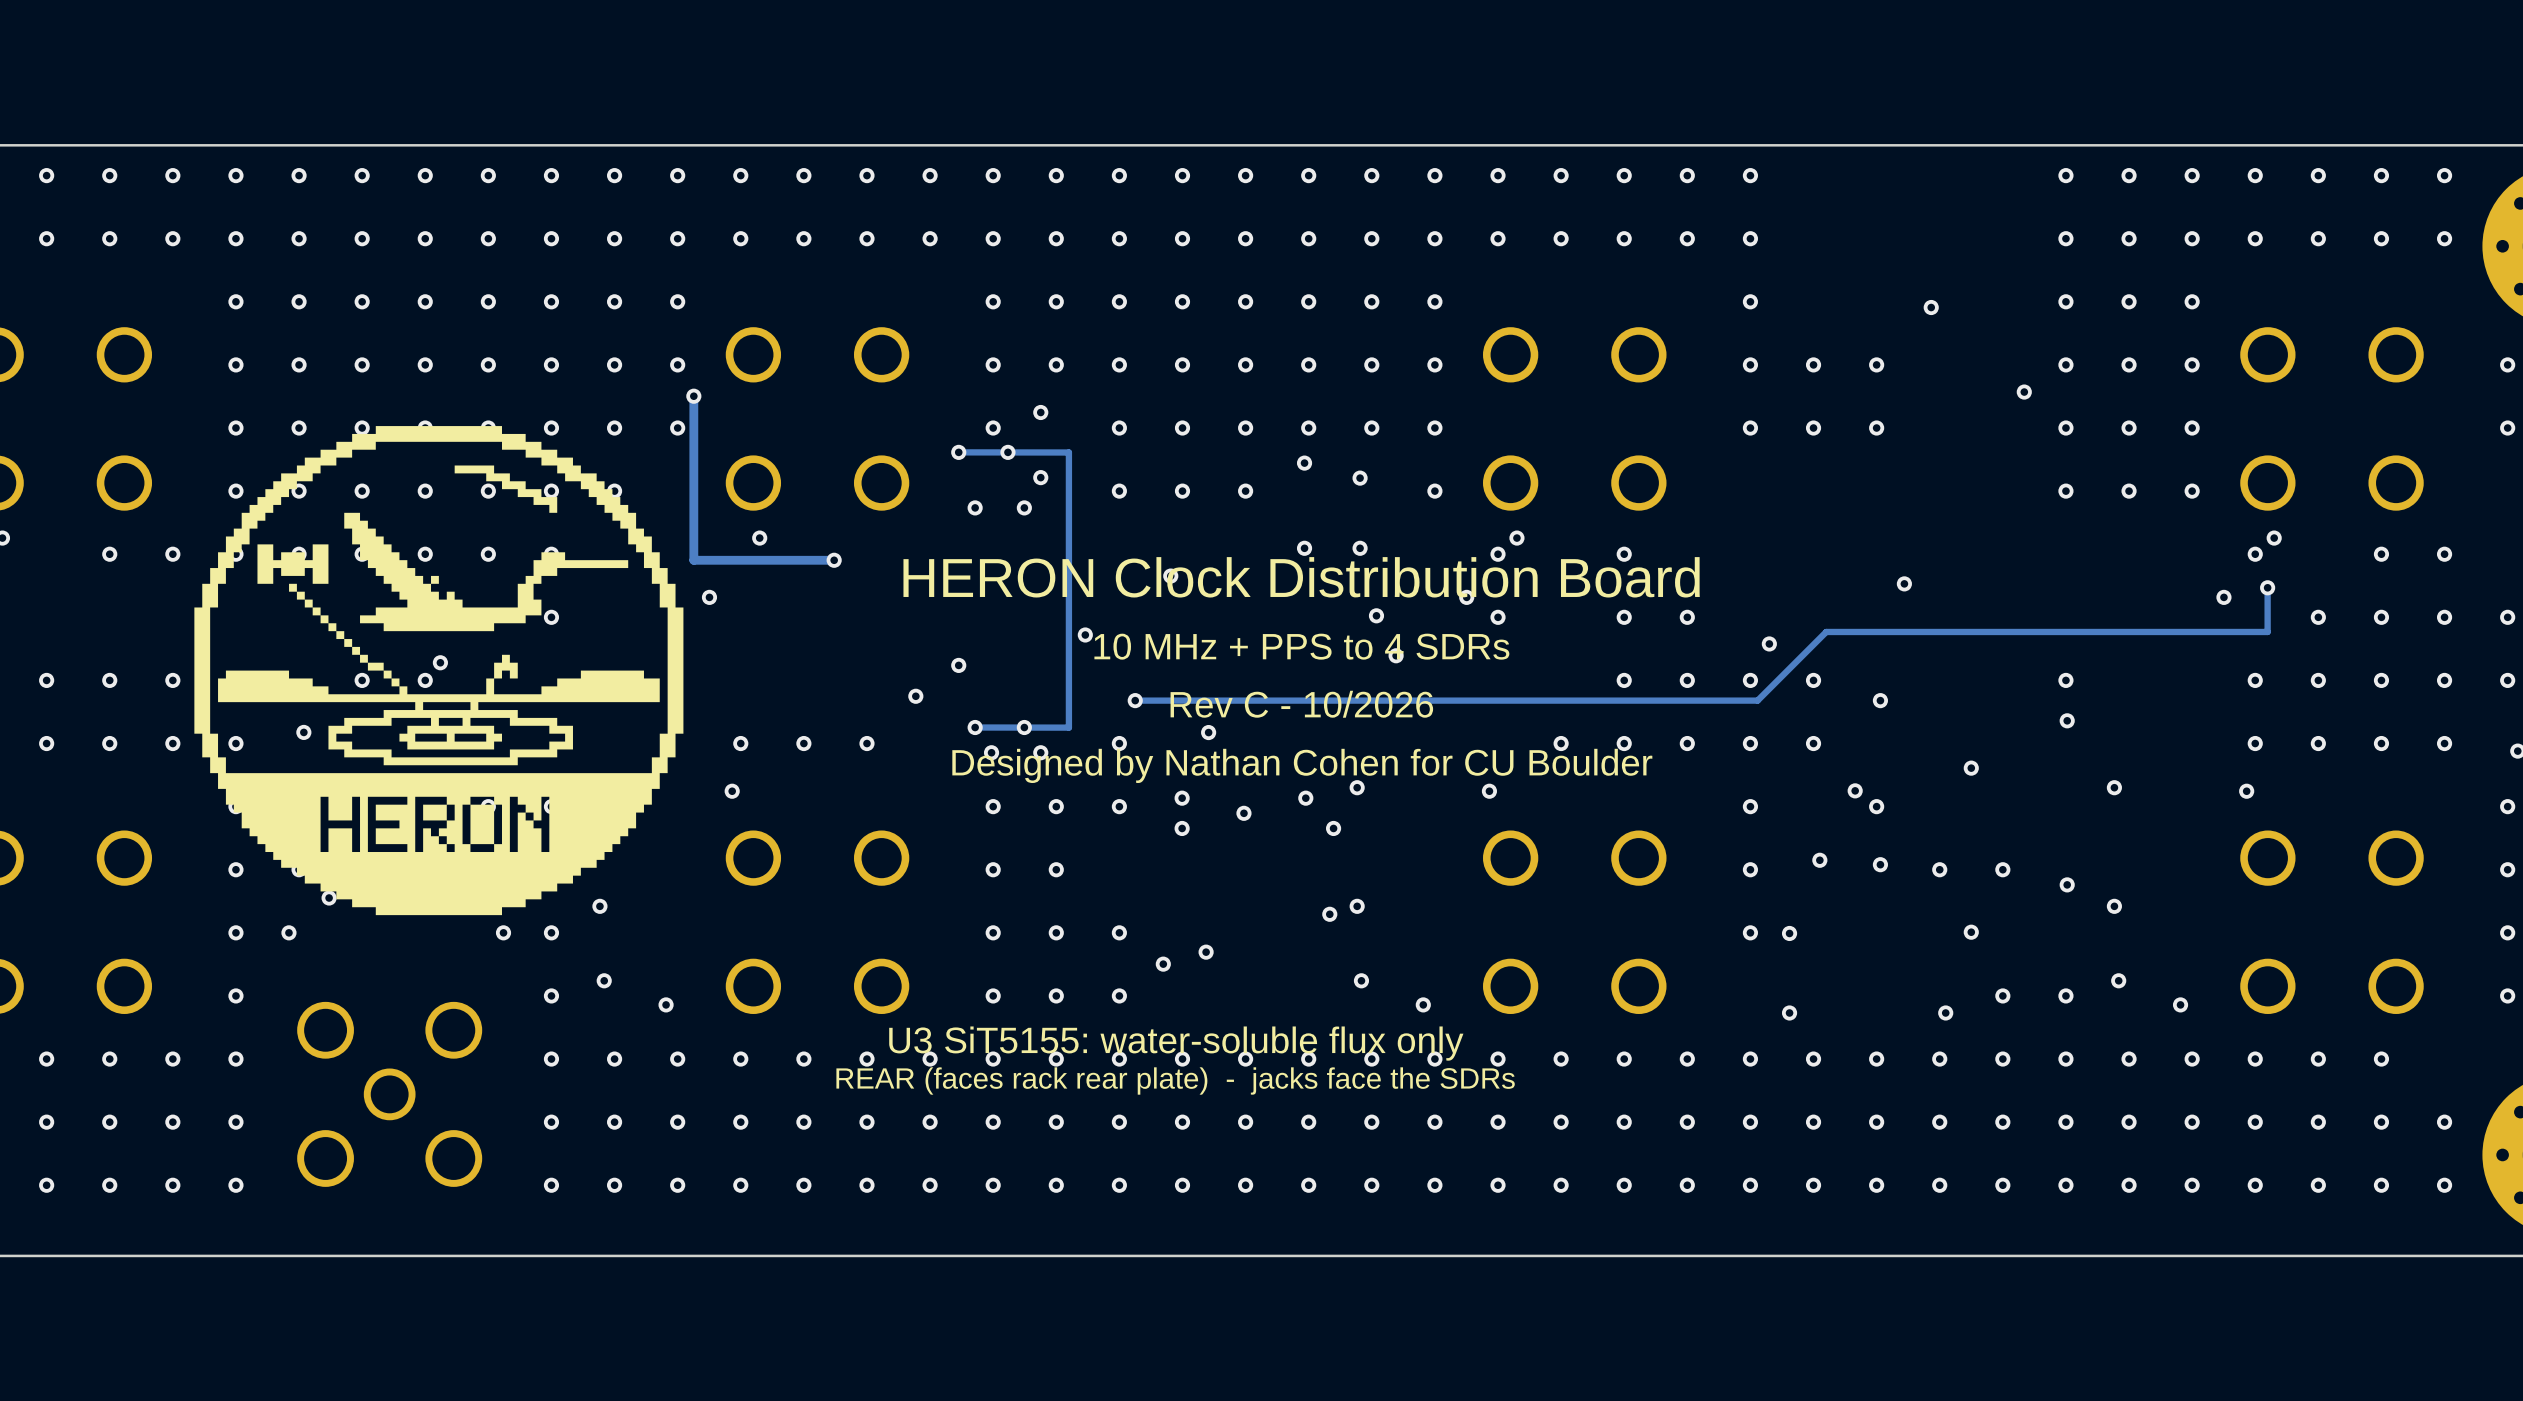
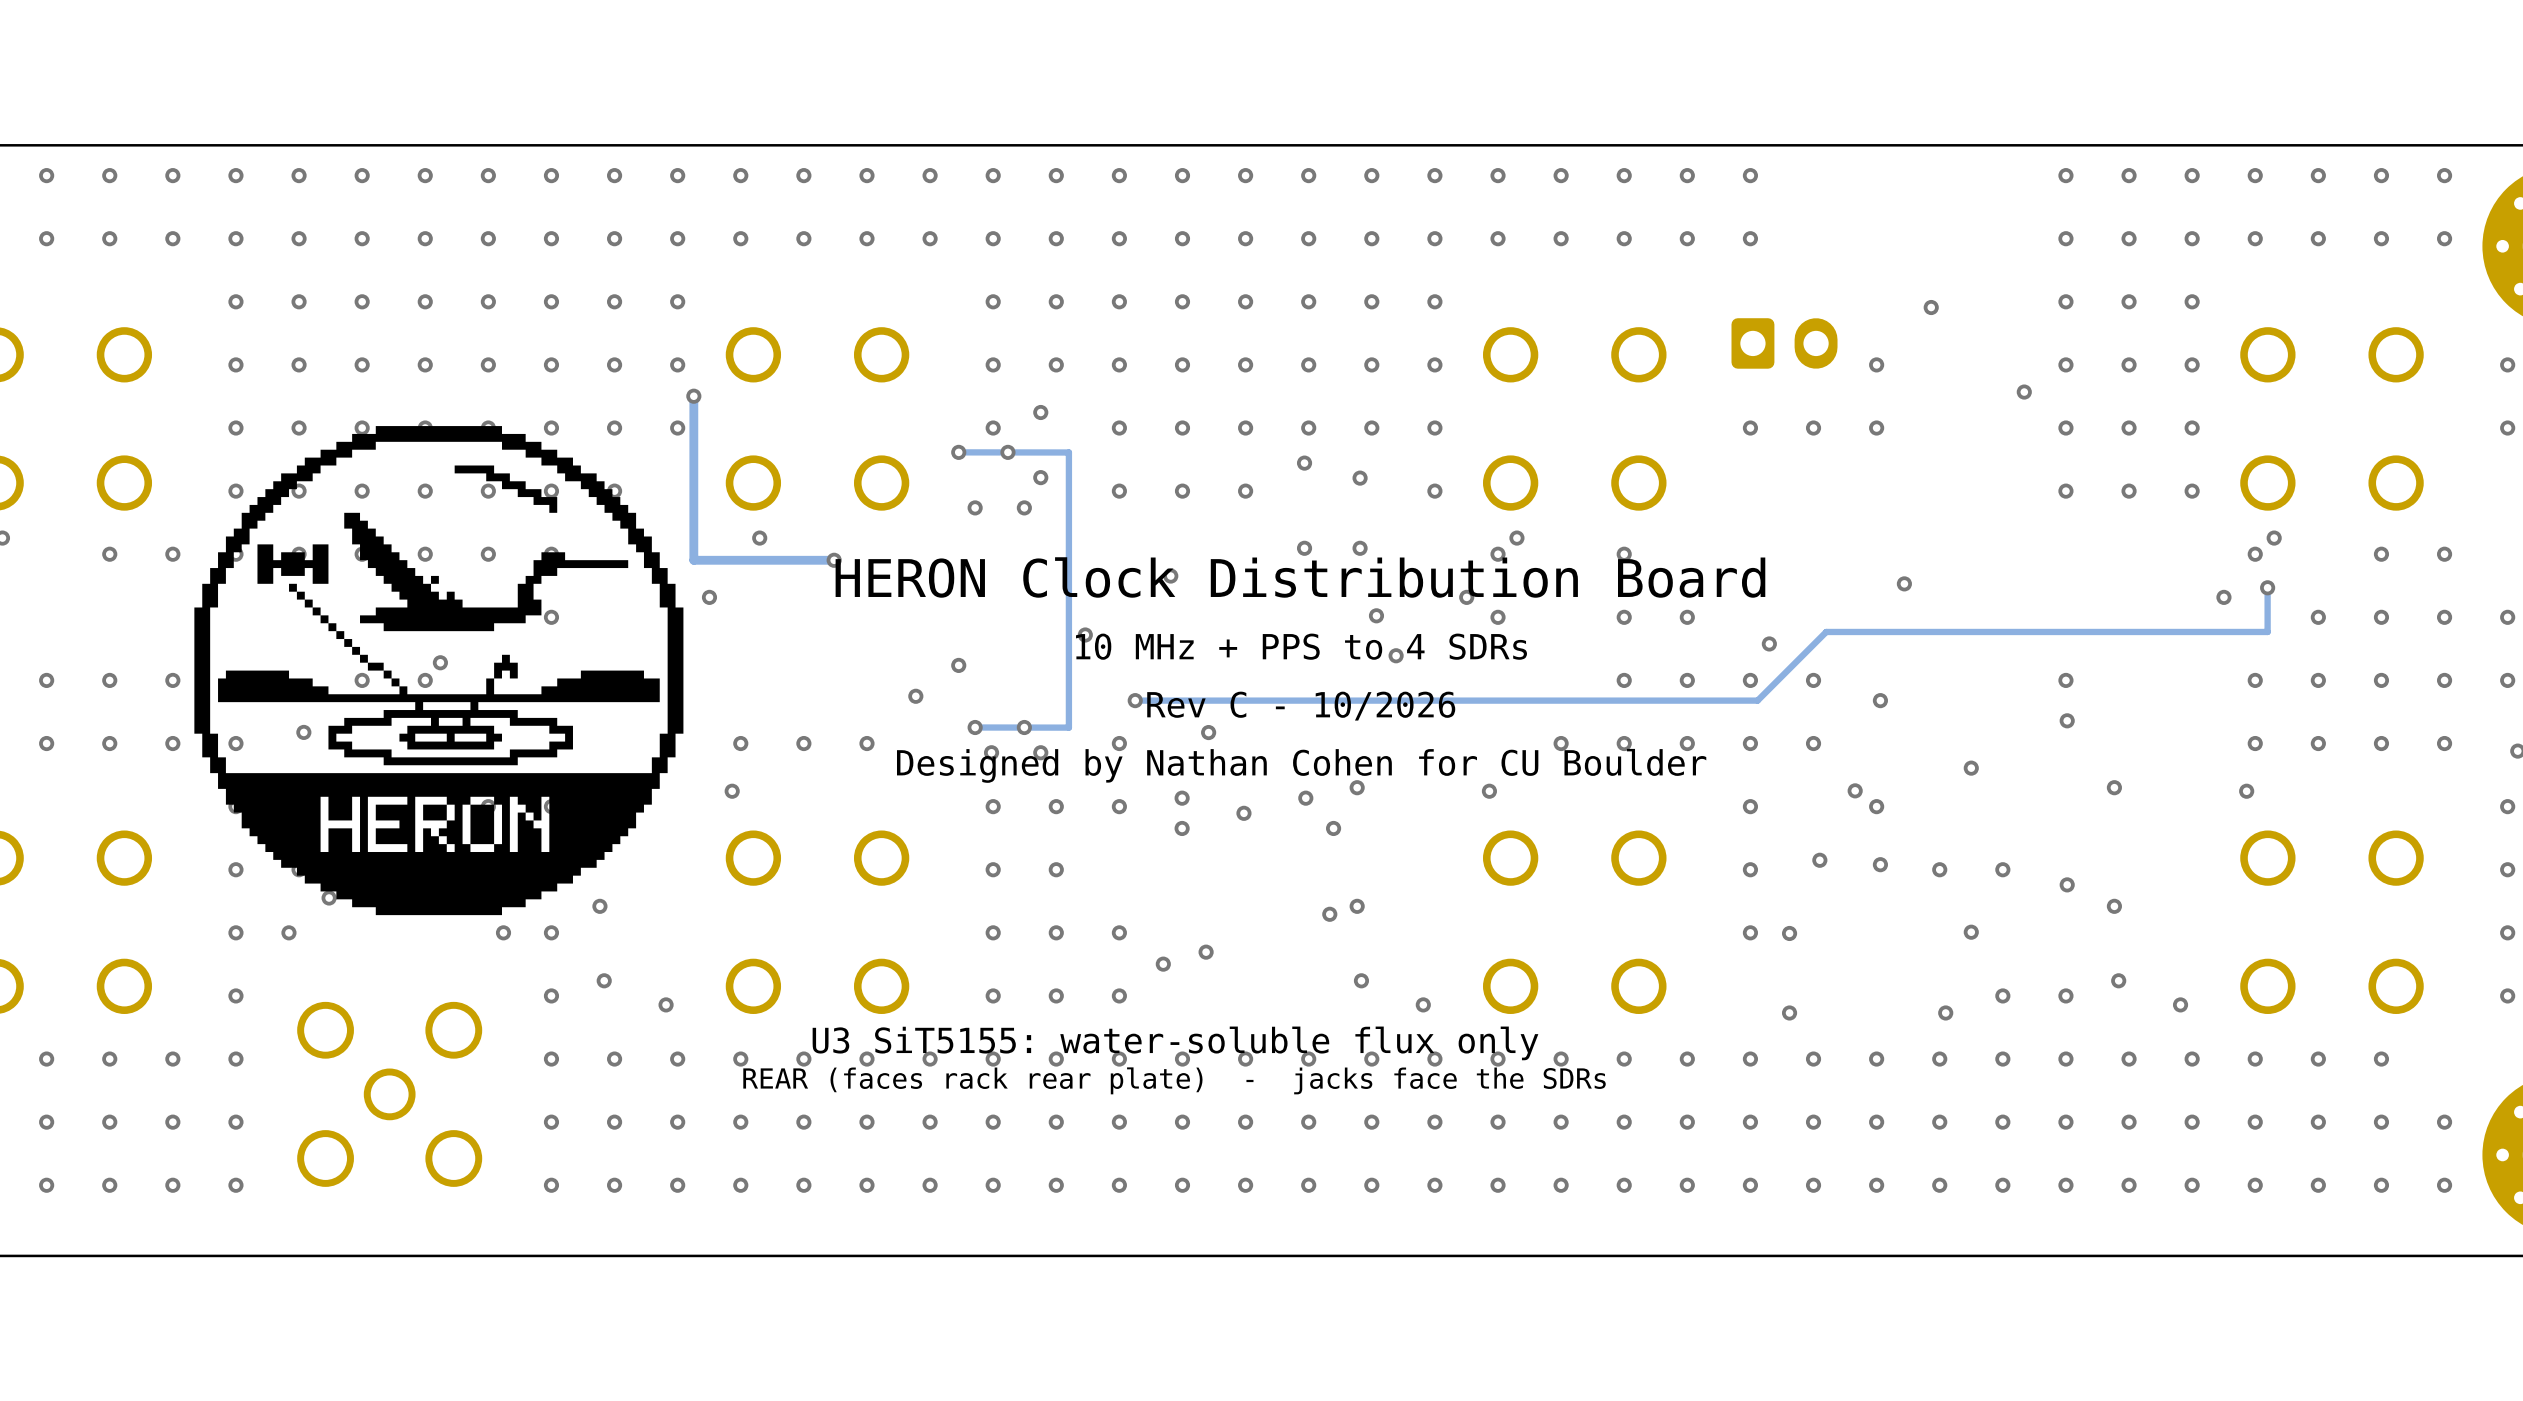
via: (1750, 301) -> none
part: none -> (1784, 343)
via: (1750, 364) -> none
via: (1813, 364) -> none

